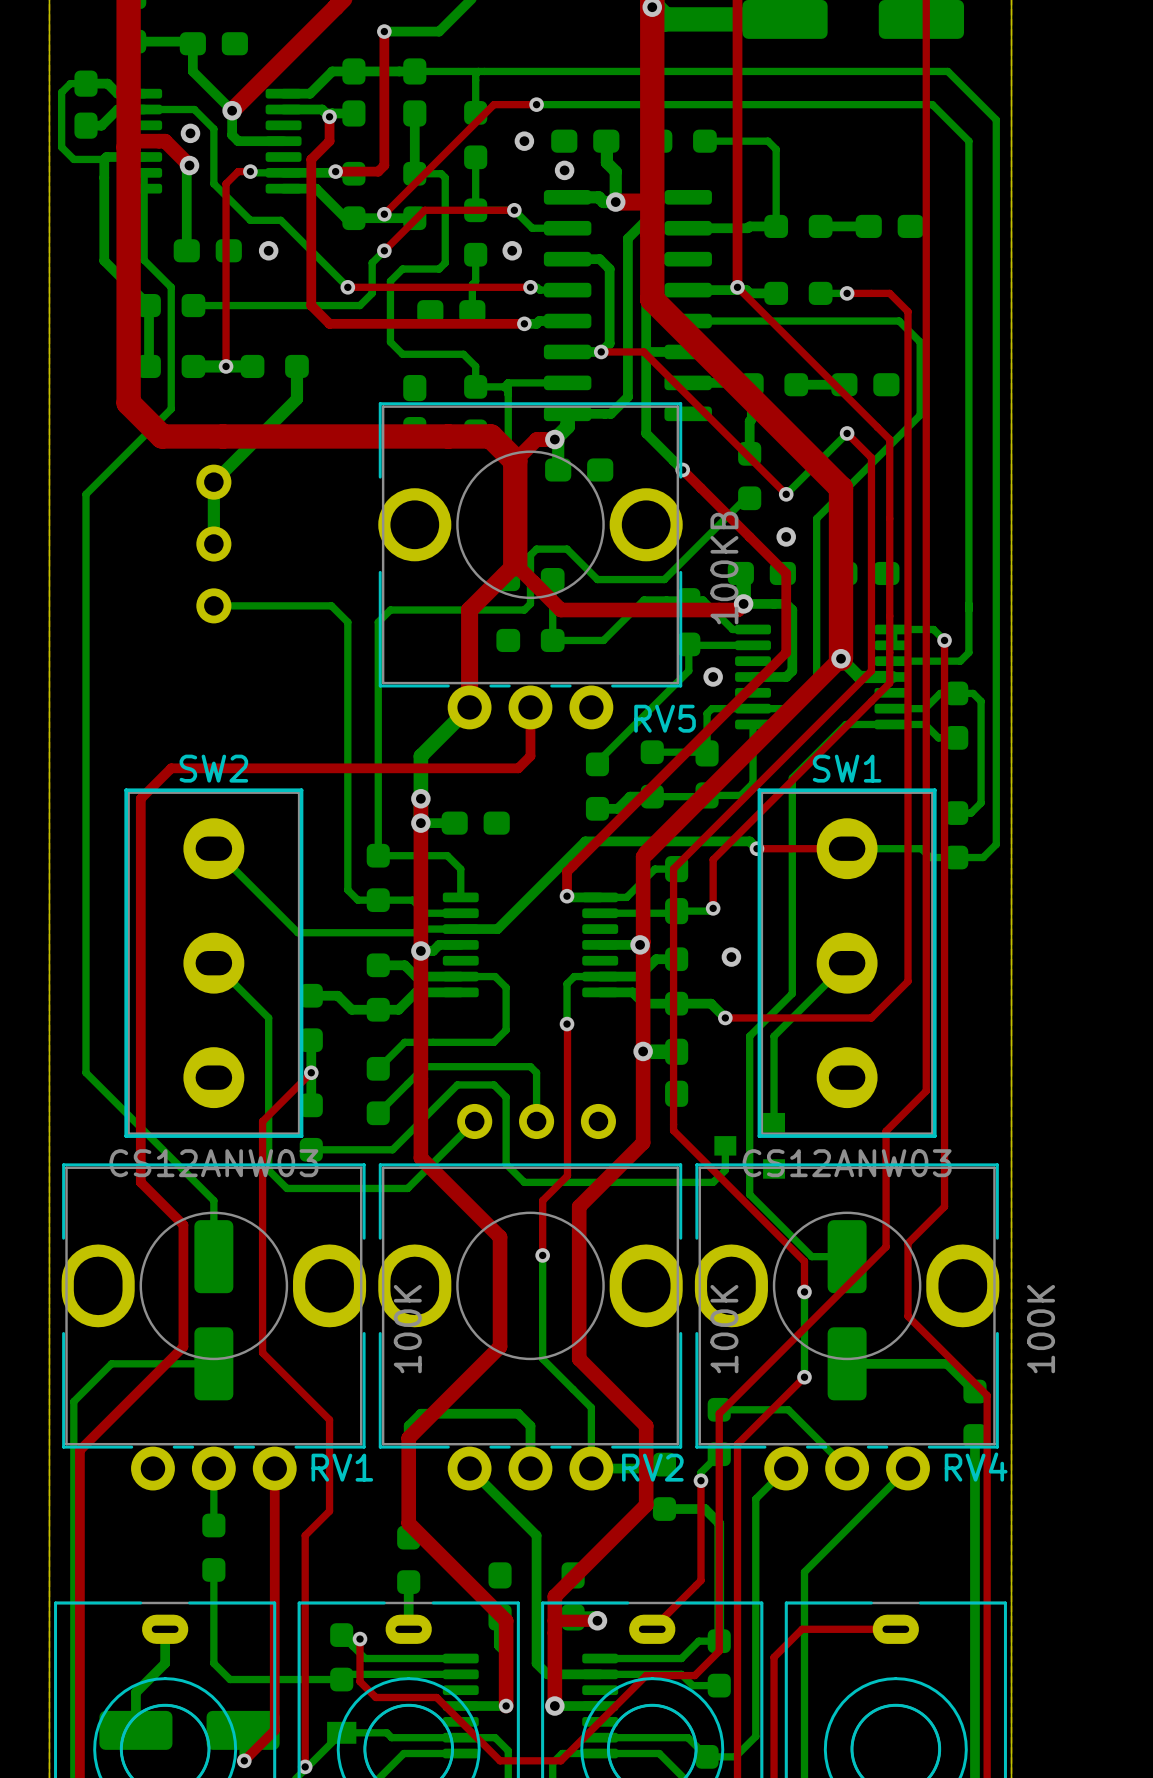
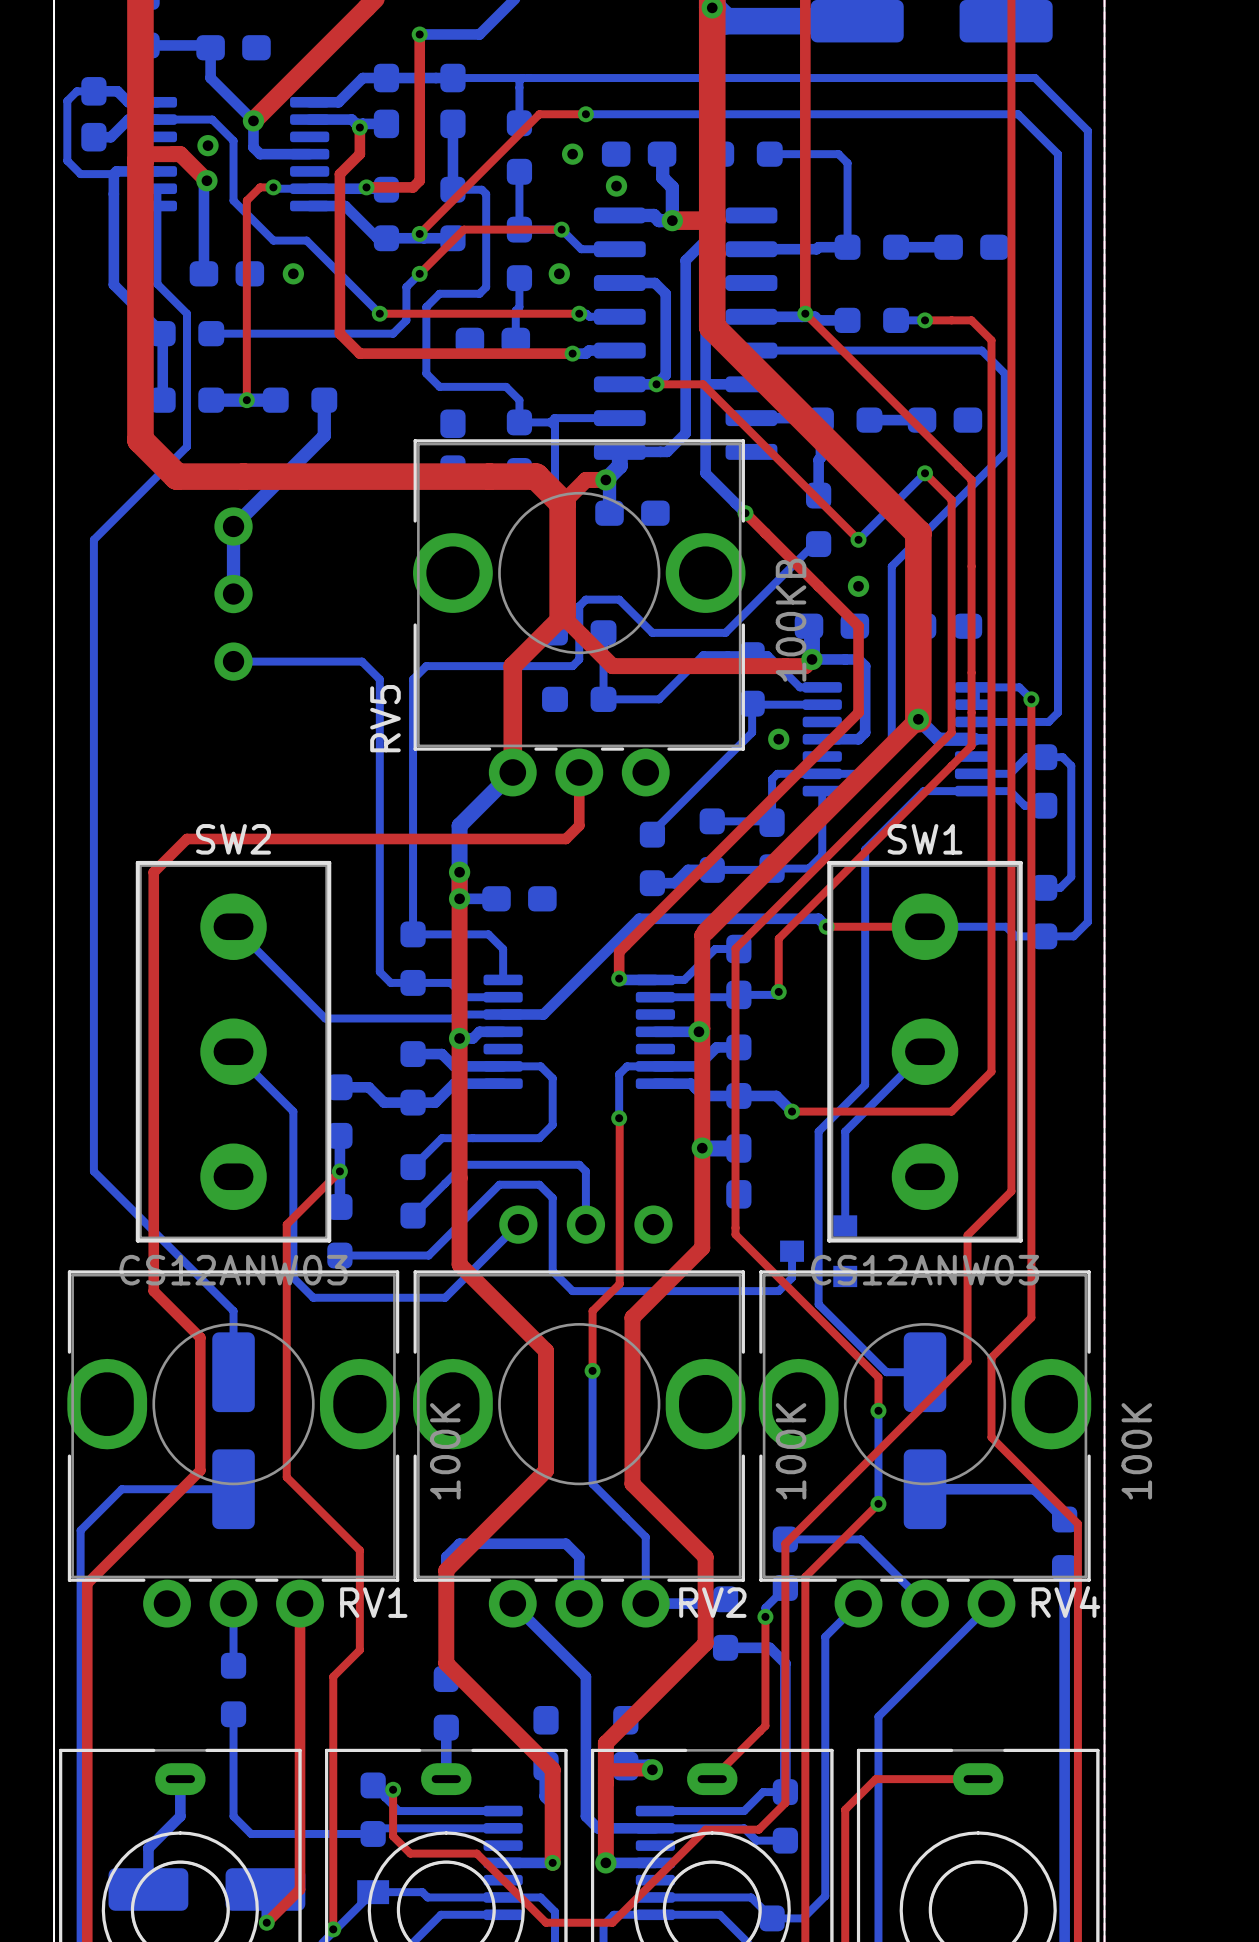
RV5 name rotation: 0° (665, 718) -> 90° counterclockwise (385, 718)
RV5 name position: RV5 (665, 718) -> RV5 (385, 718)
via: (731, 957) -> none

